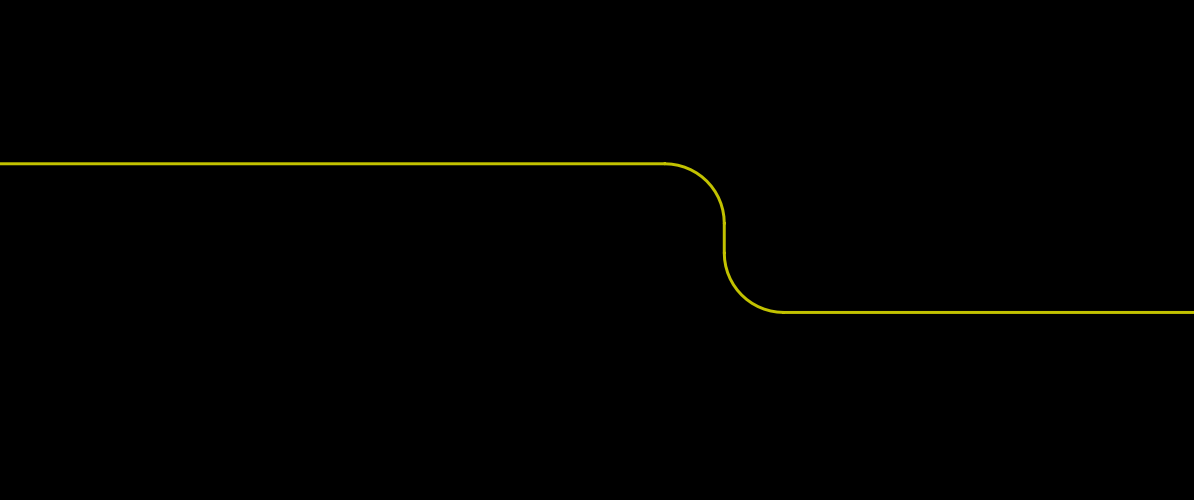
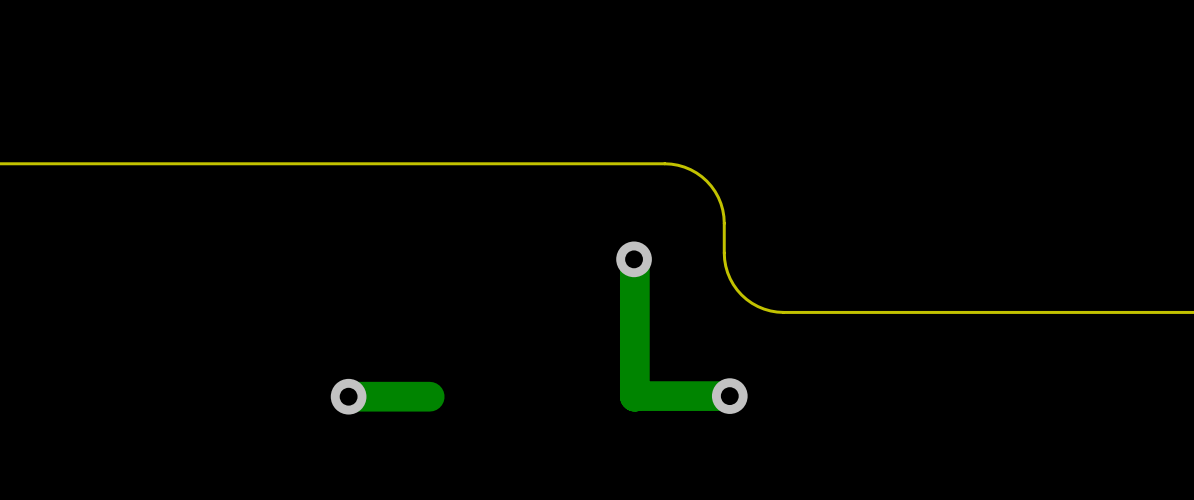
via: none -> (634, 259)
track: none -> (634, 260) (634, 396)
via: none -> (348, 396)
track: none -> (429, 396) (348, 396)
track: none -> (729, 396) (635, 396)
via: none -> (729, 396)

